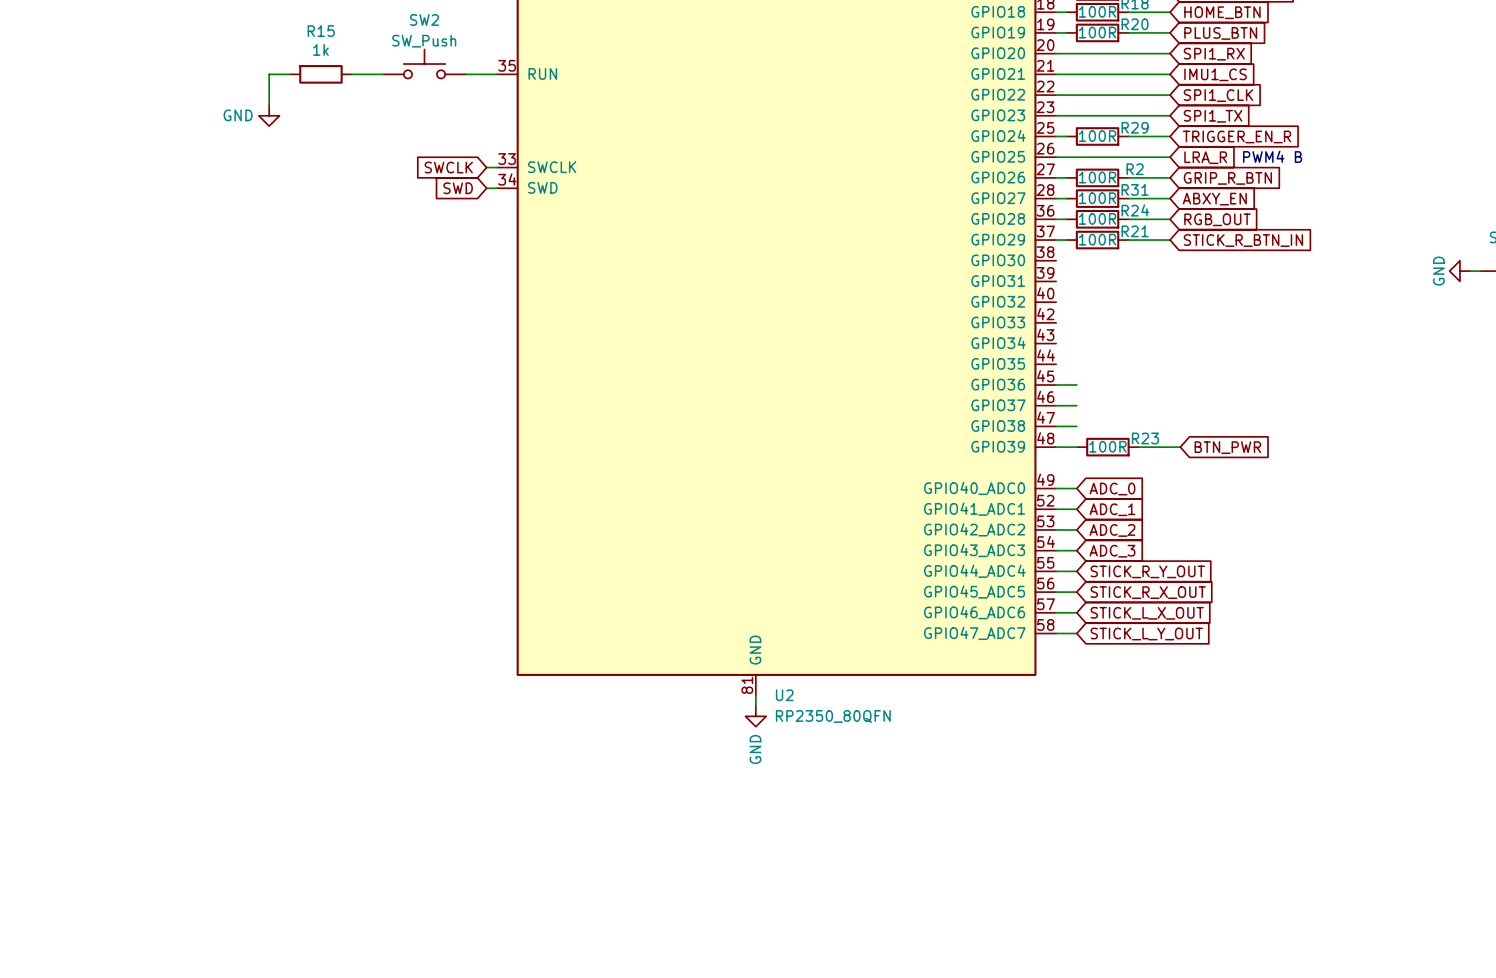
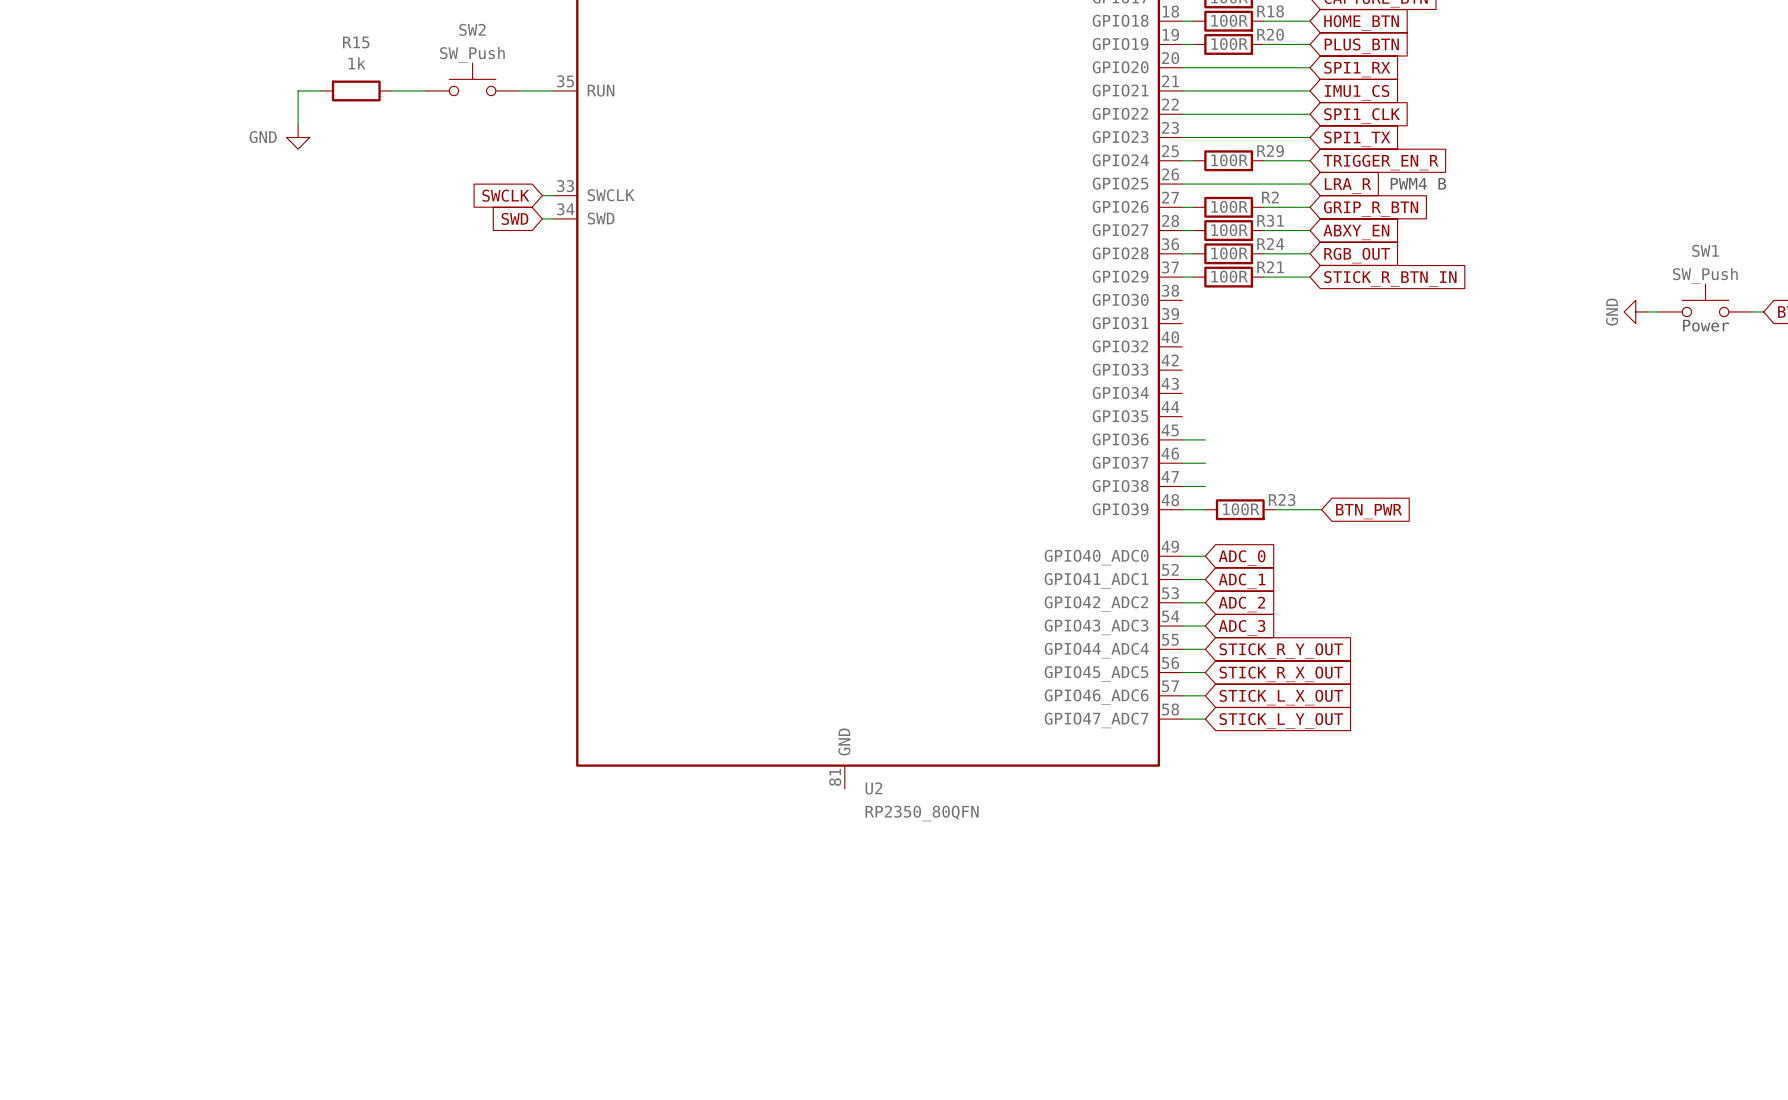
wire: (755, 695) (755, 706) -> none
power symbol: GND (755, 716) -> none

